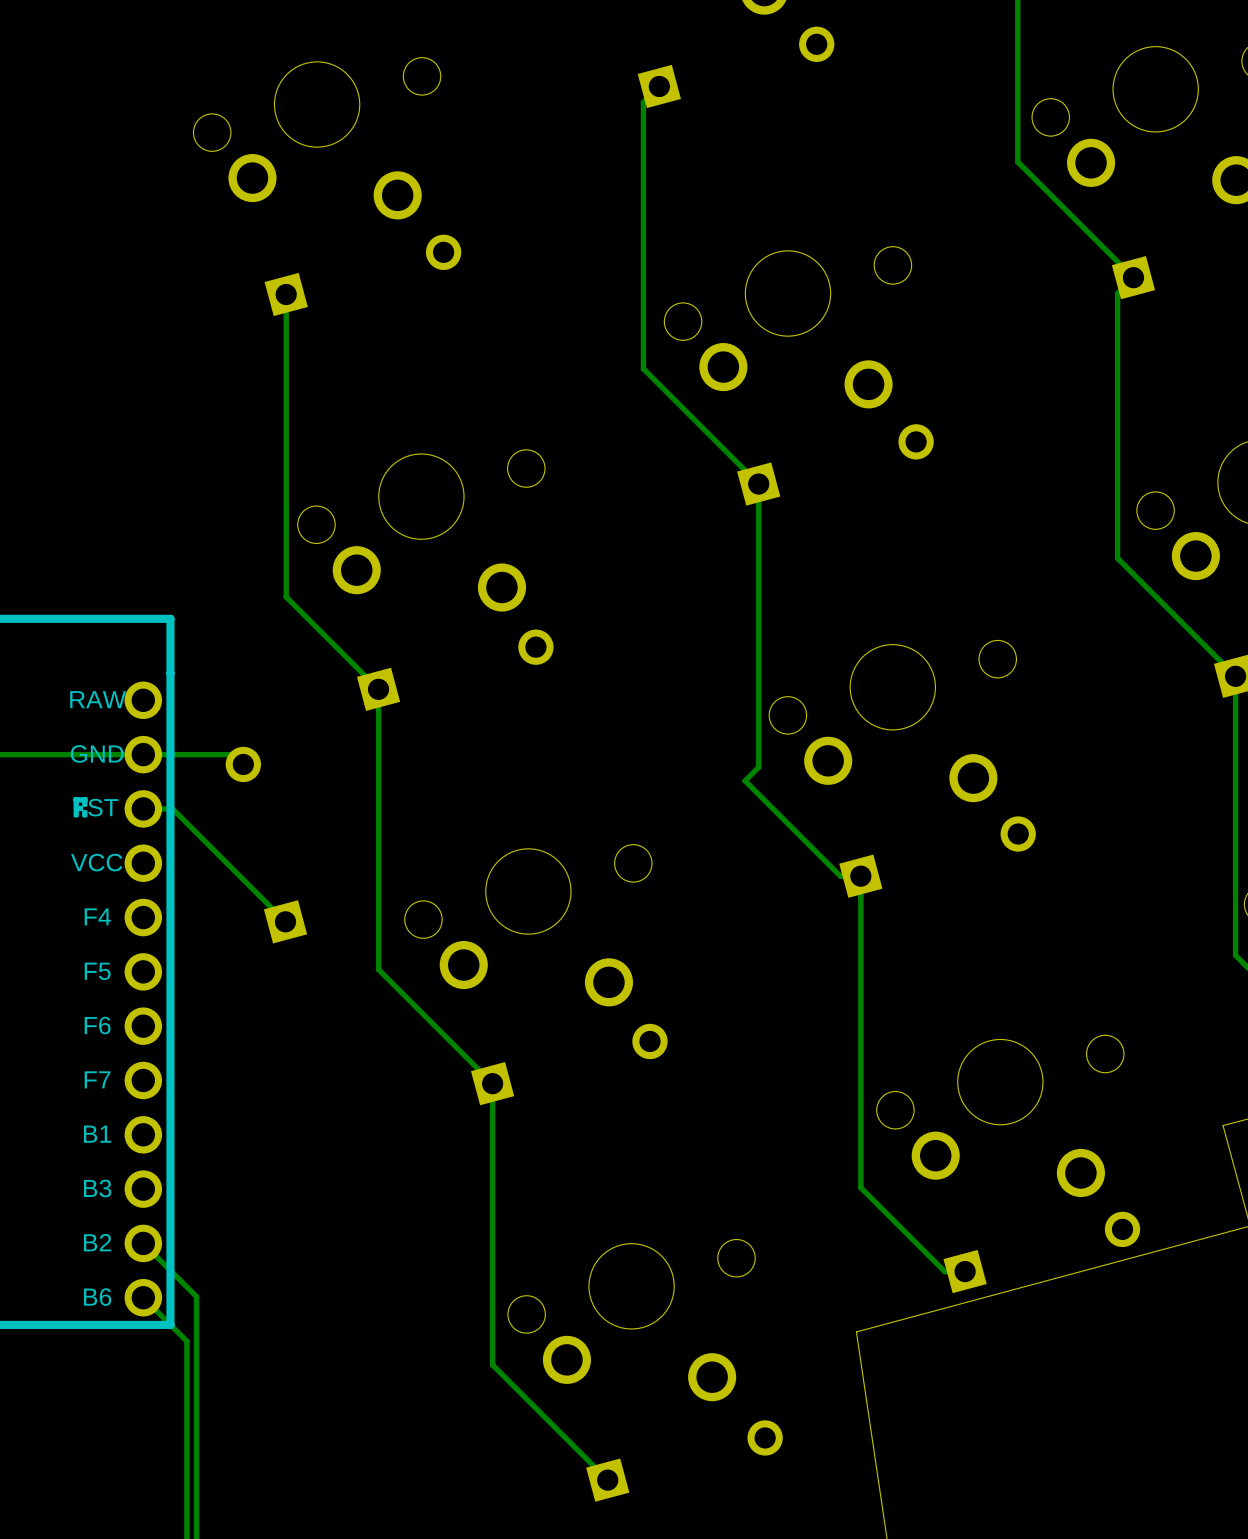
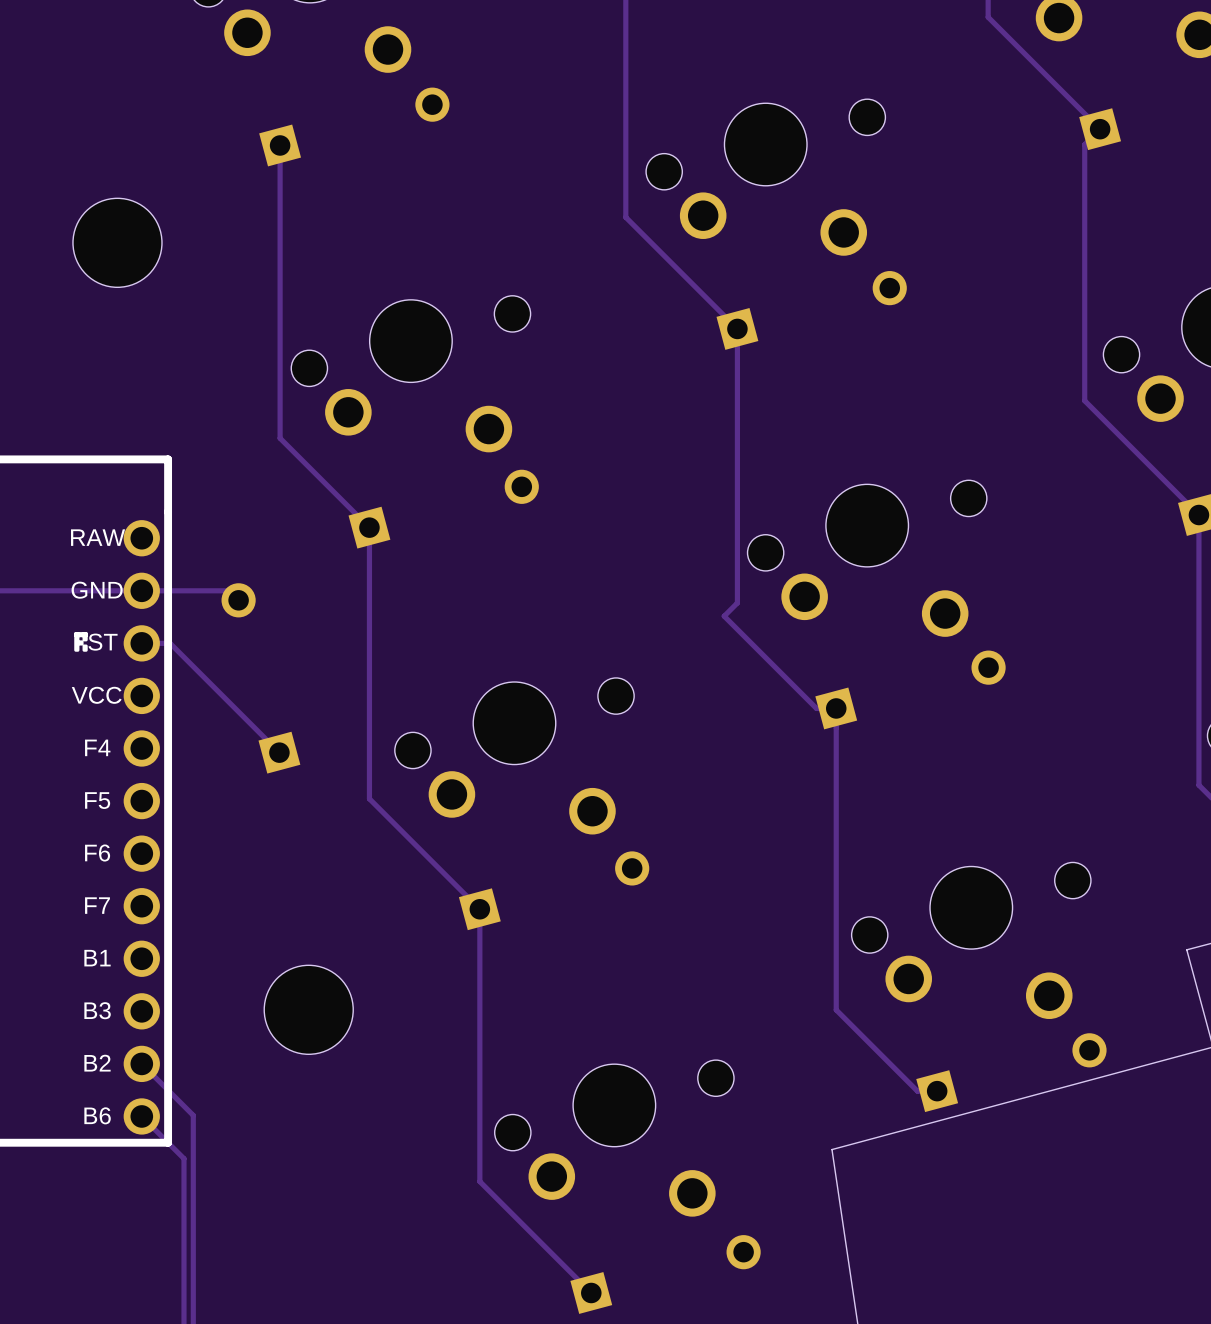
part: none -> (117, 242)
part: none -> (308, 1009)

